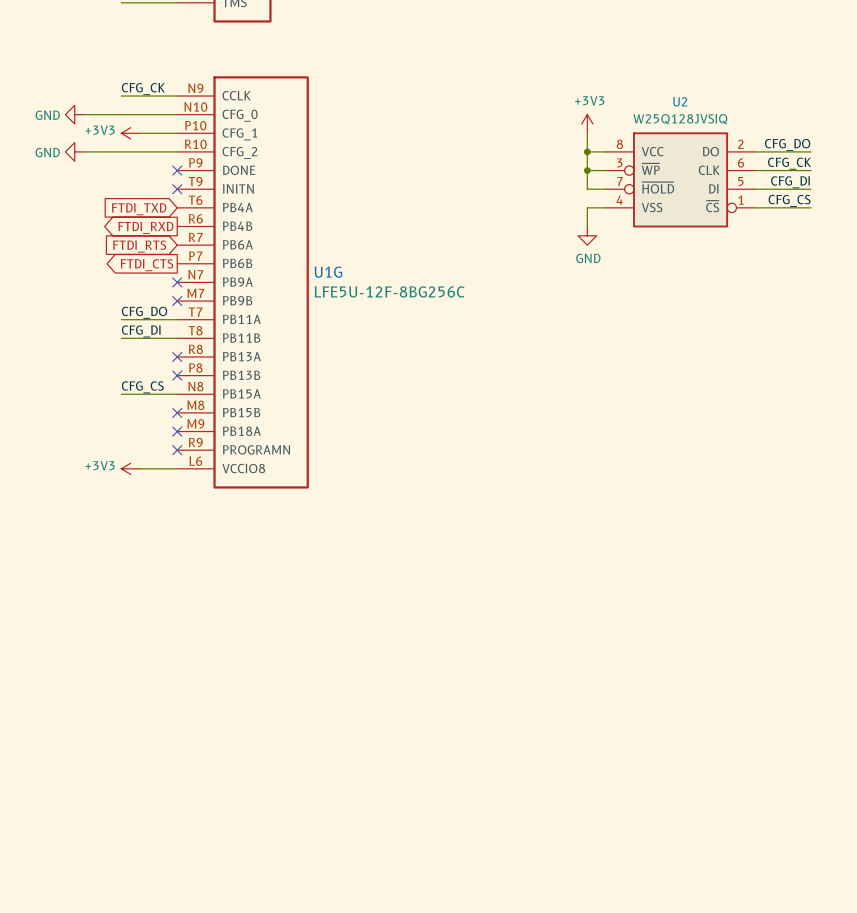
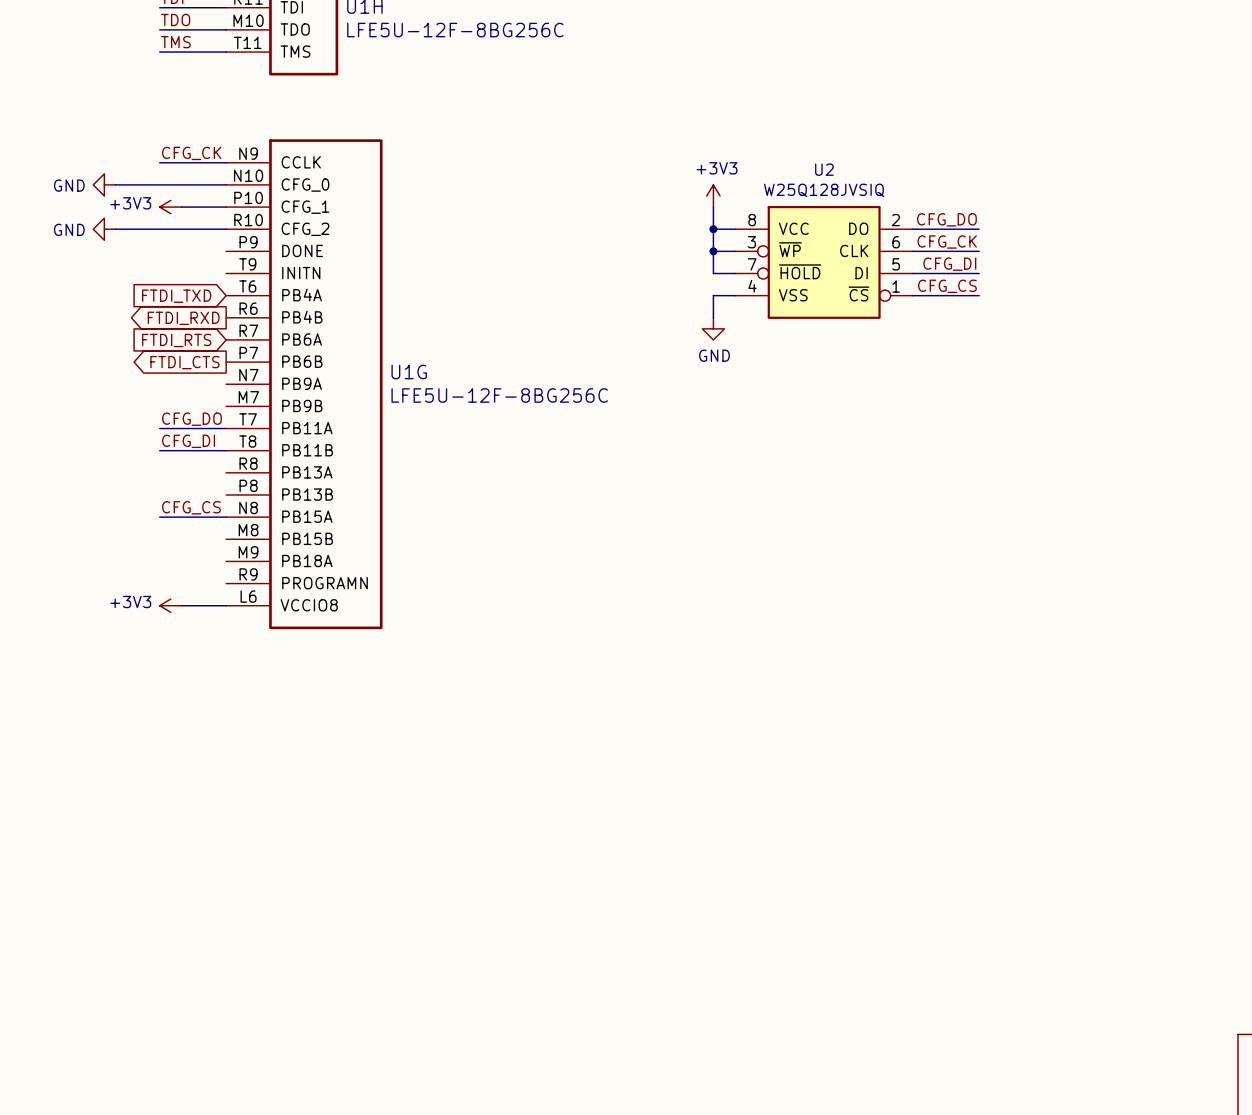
no-connect mark: (177, 170) -> none
no-connect mark: (177, 189) -> none
no-connect mark: (177, 282) -> none
no-connect mark: (177, 301) -> none
no-connect mark: (177, 356) -> none
no-connect mark: (177, 375) -> none
no-connect mark: (177, 412) -> none
no-connect mark: (177, 431) -> none
no-connect mark: (177, 450) -> none

